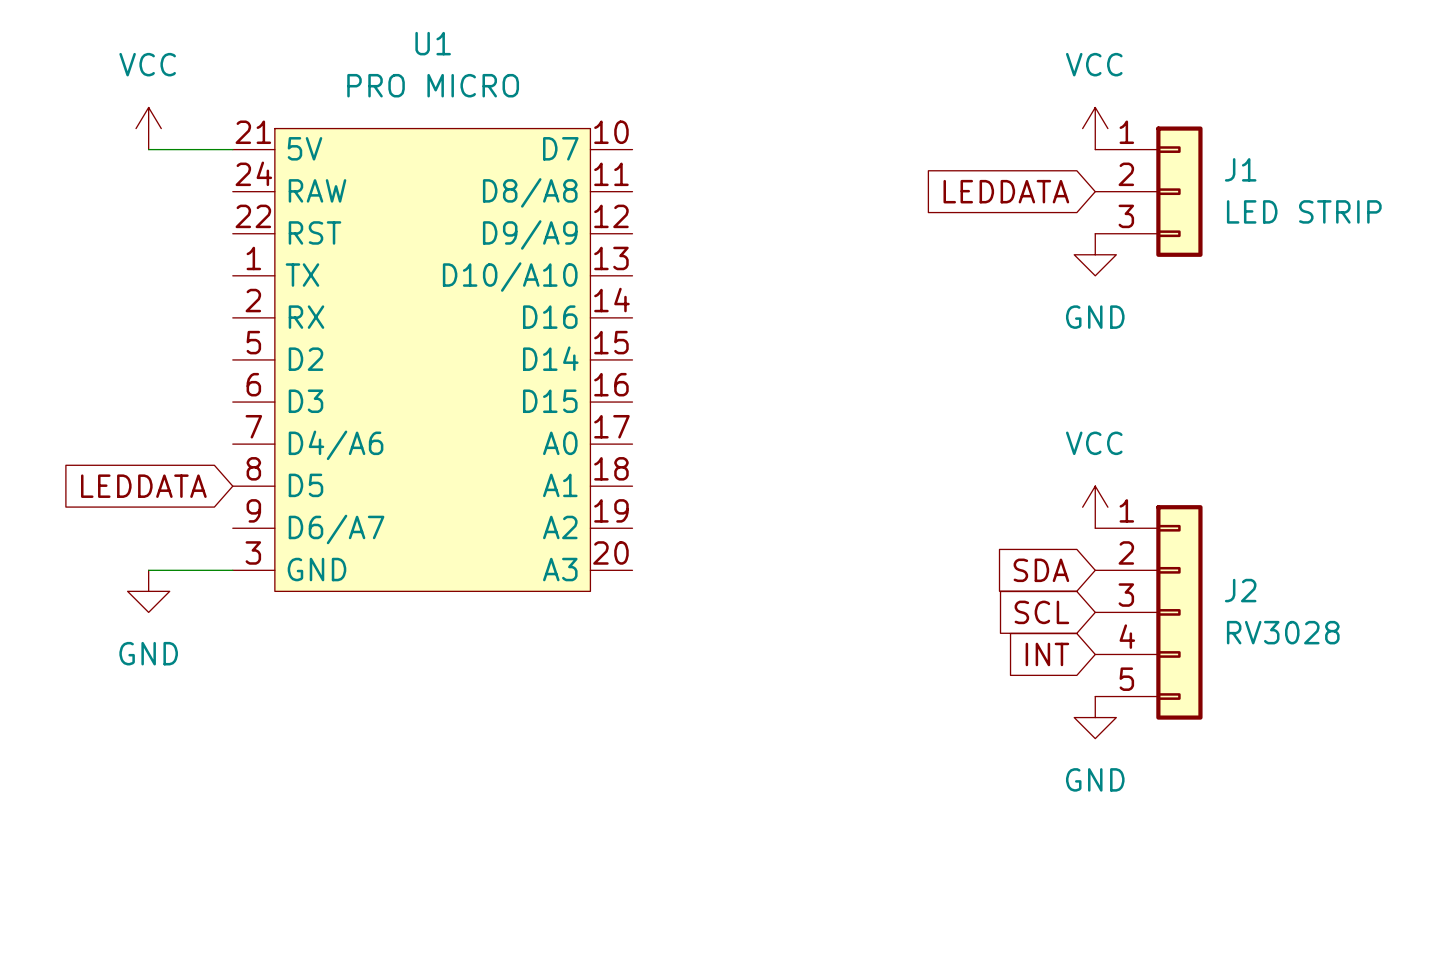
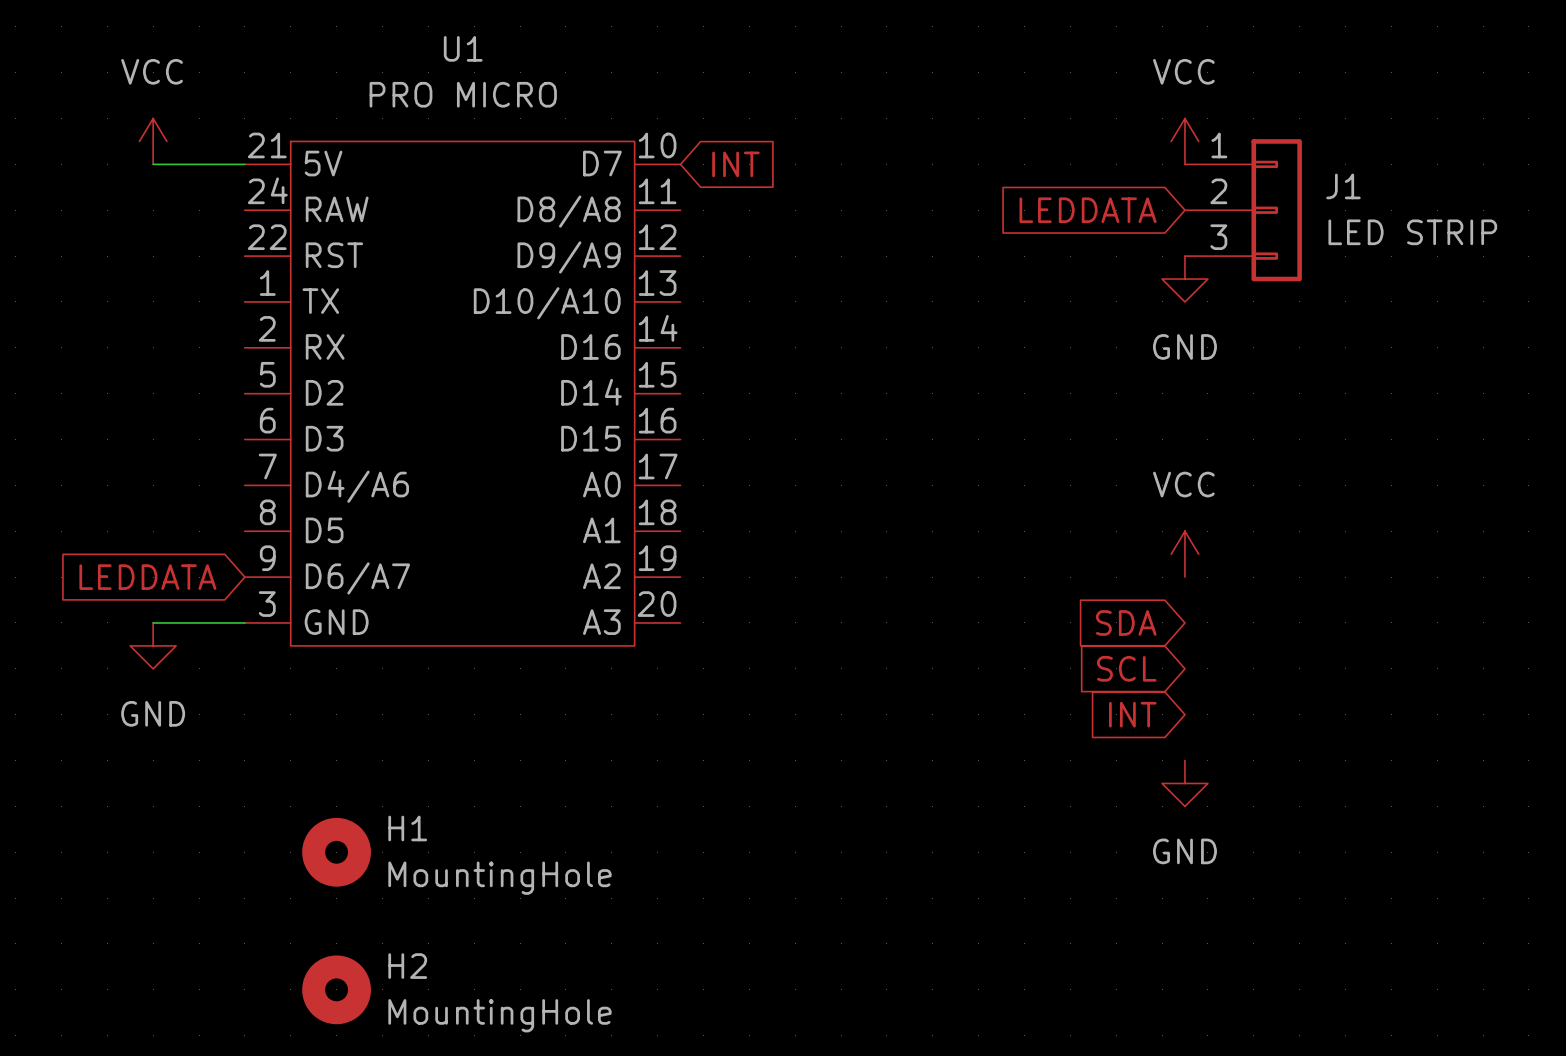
global label: none -> INT (735, 164)
global label position: LEDDATA (143, 486) -> LEDDATA (147, 577)
J2: RV3028 (1148, 612) -> none
H1: none -> MountingHole (336, 852)
H2: none -> MountingHole (336, 989)

